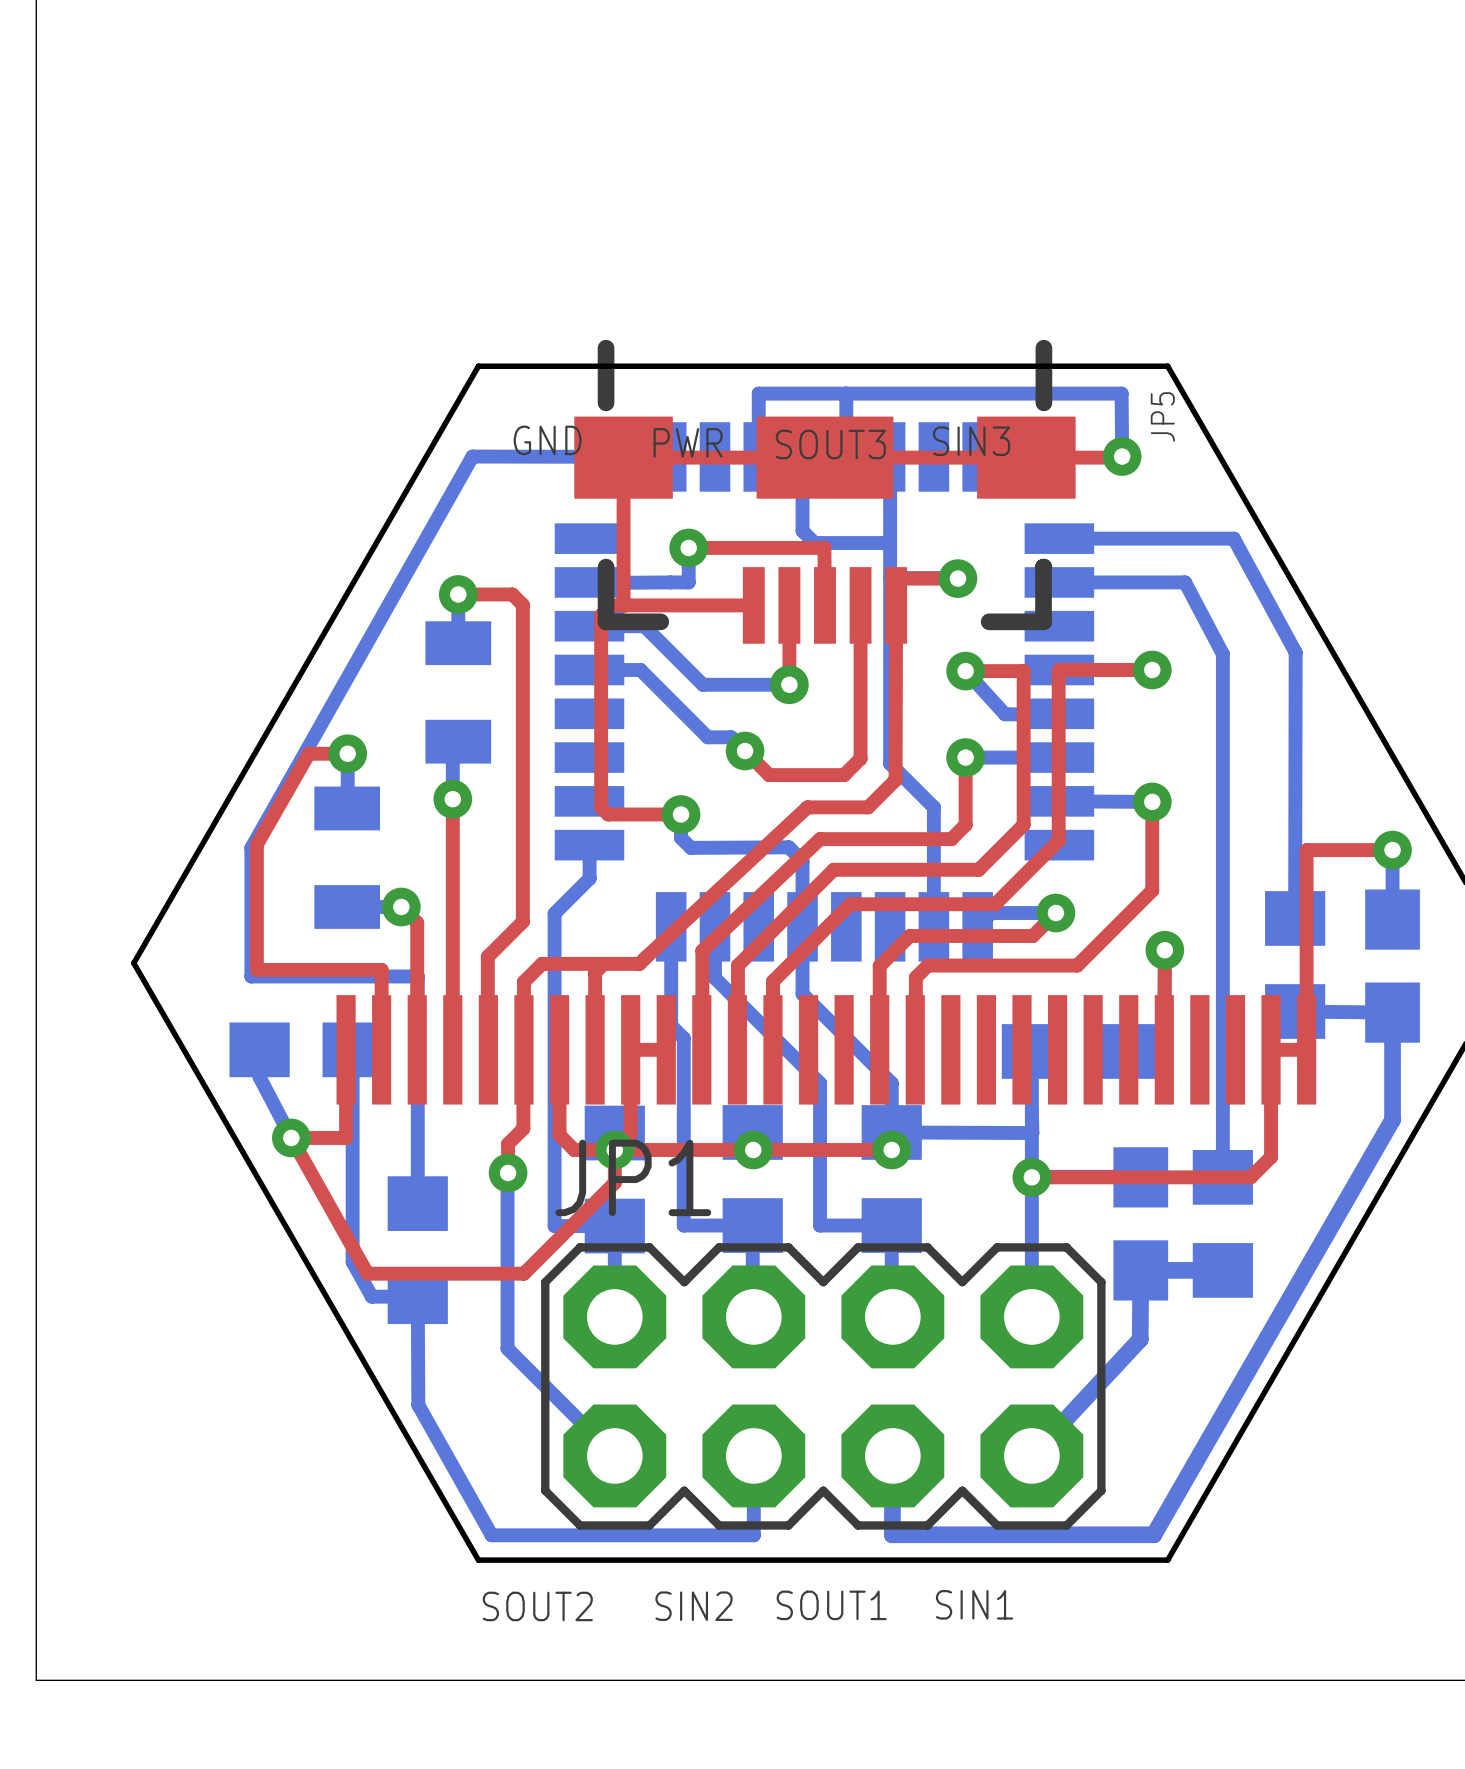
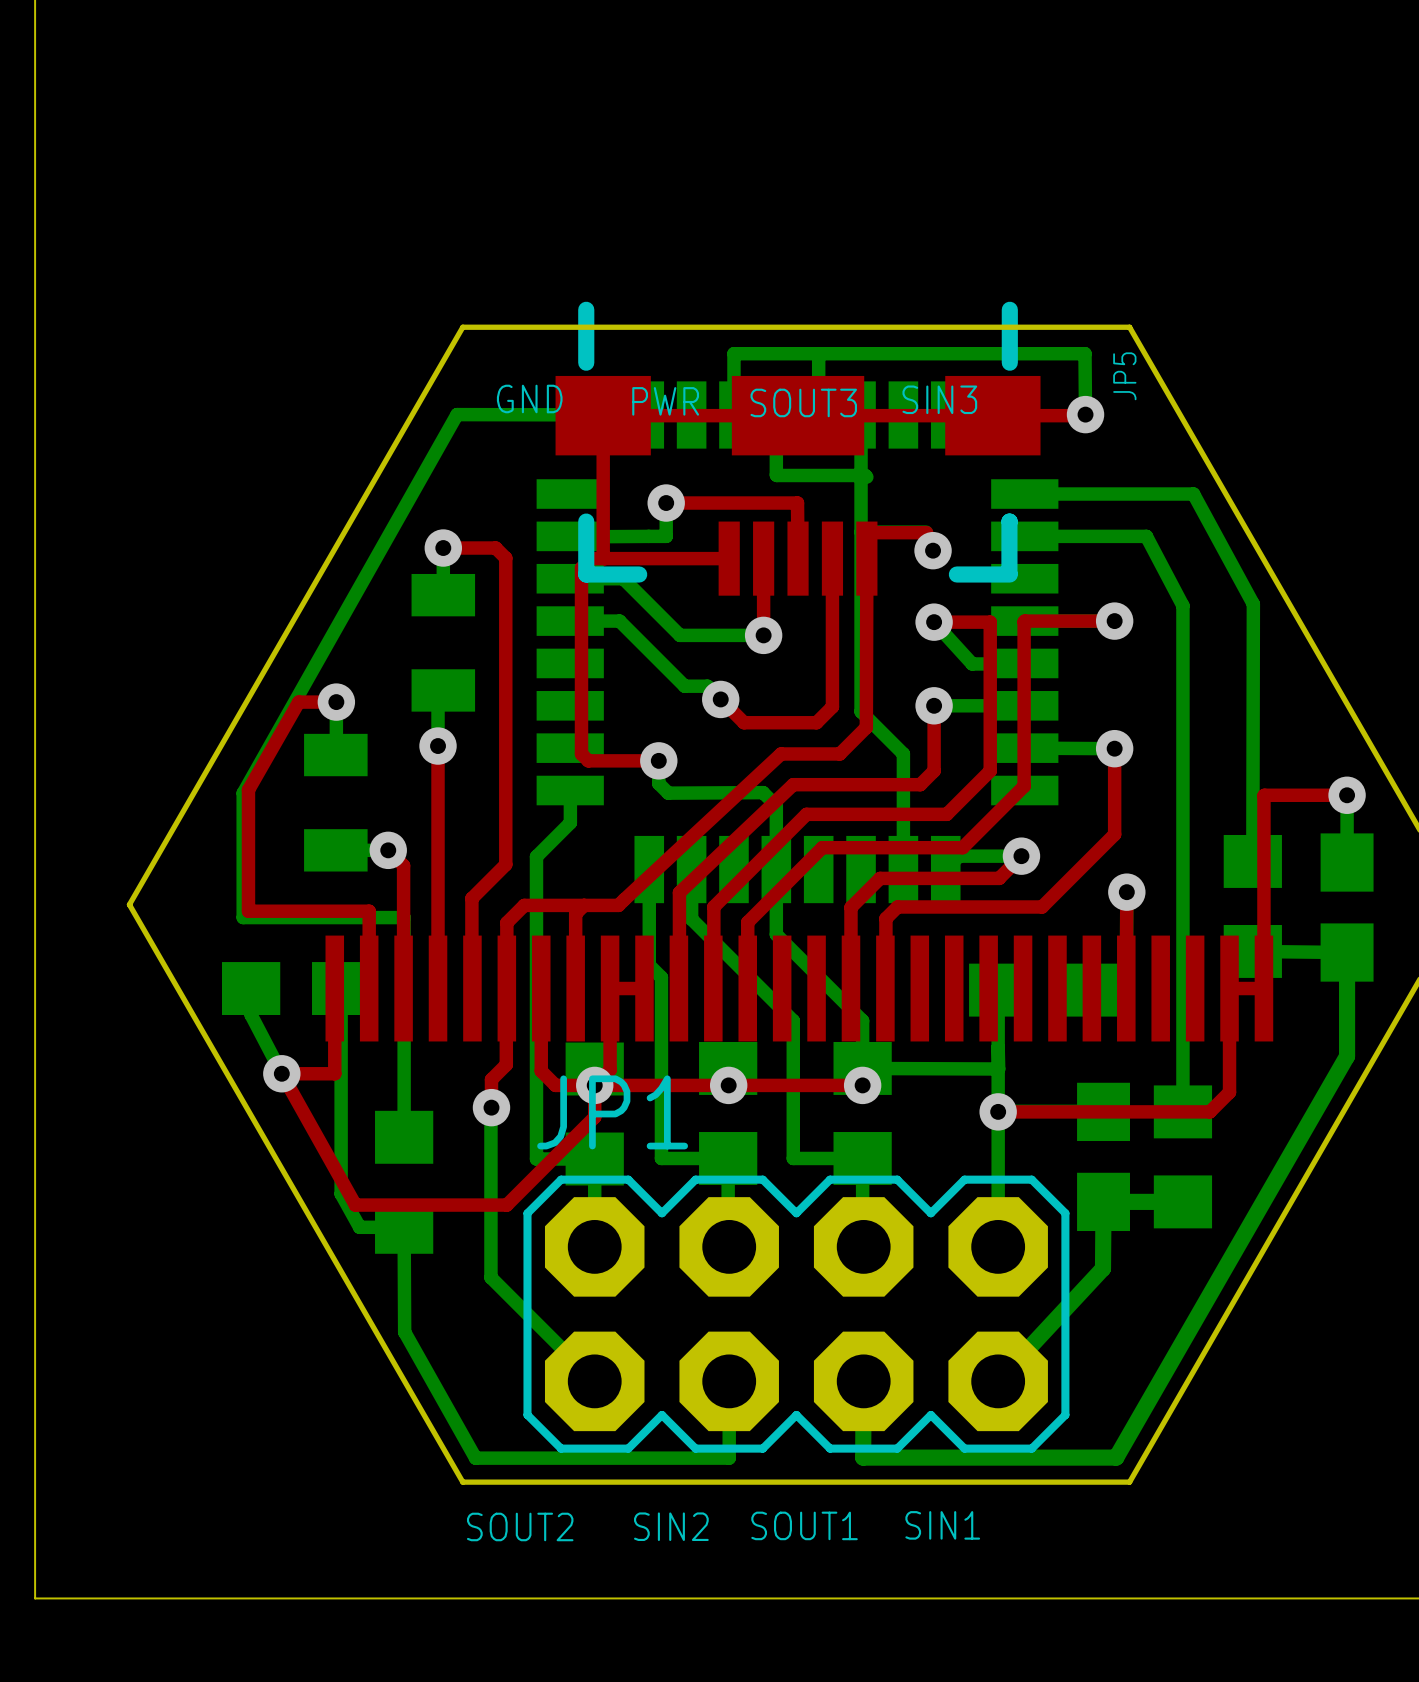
bottom track: (802, 518) (802, 530) (814, 543) (889, 543) -> (776, 475) (865, 475) (866, 477)
via position: (957, 578) -> (933, 550)

